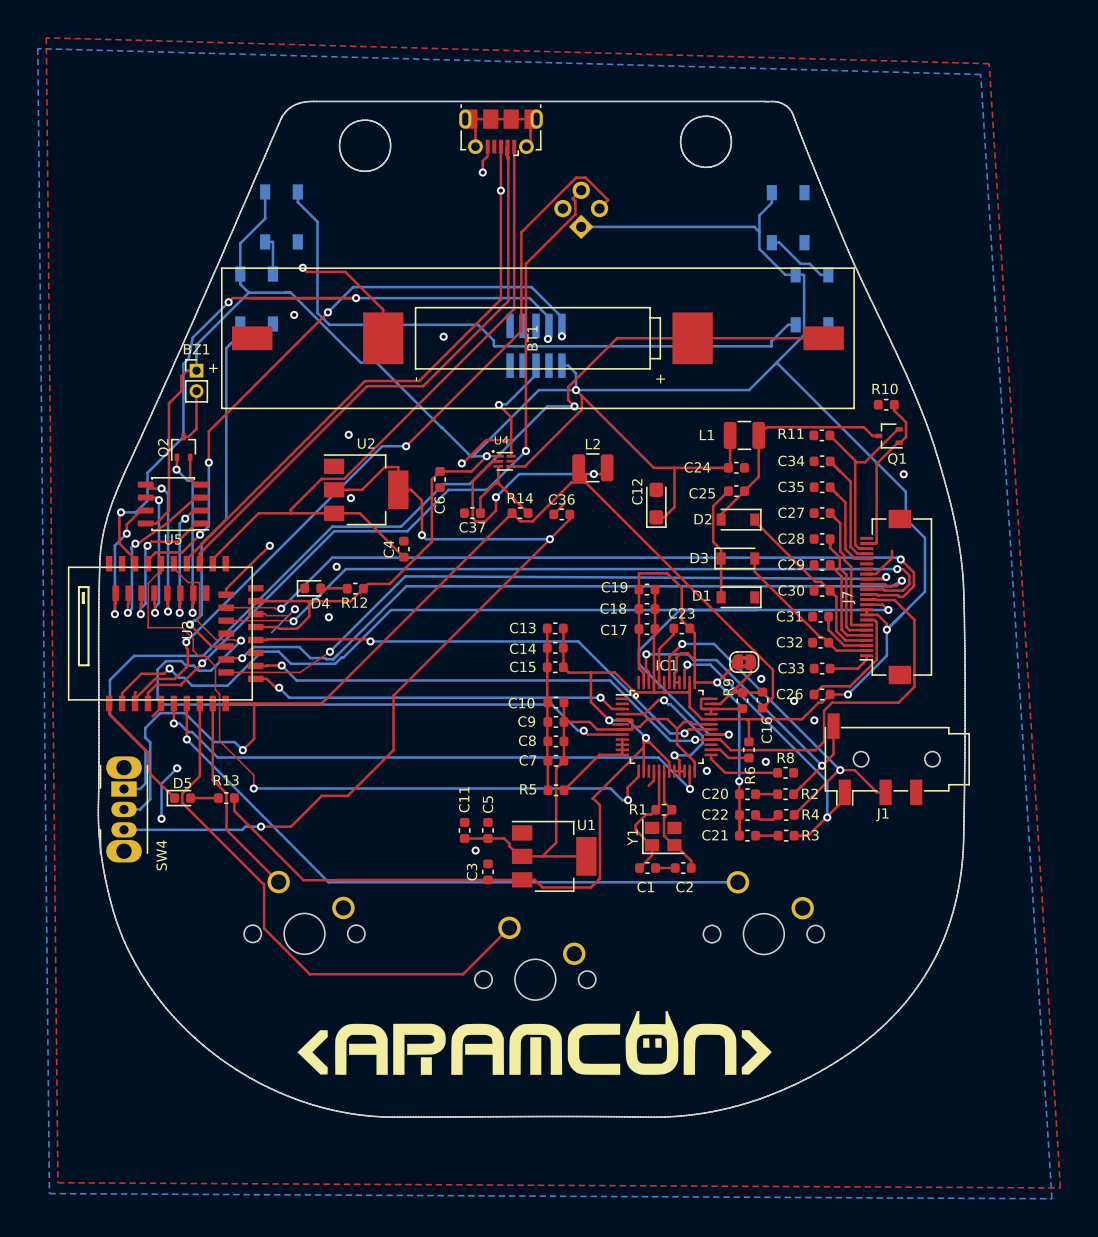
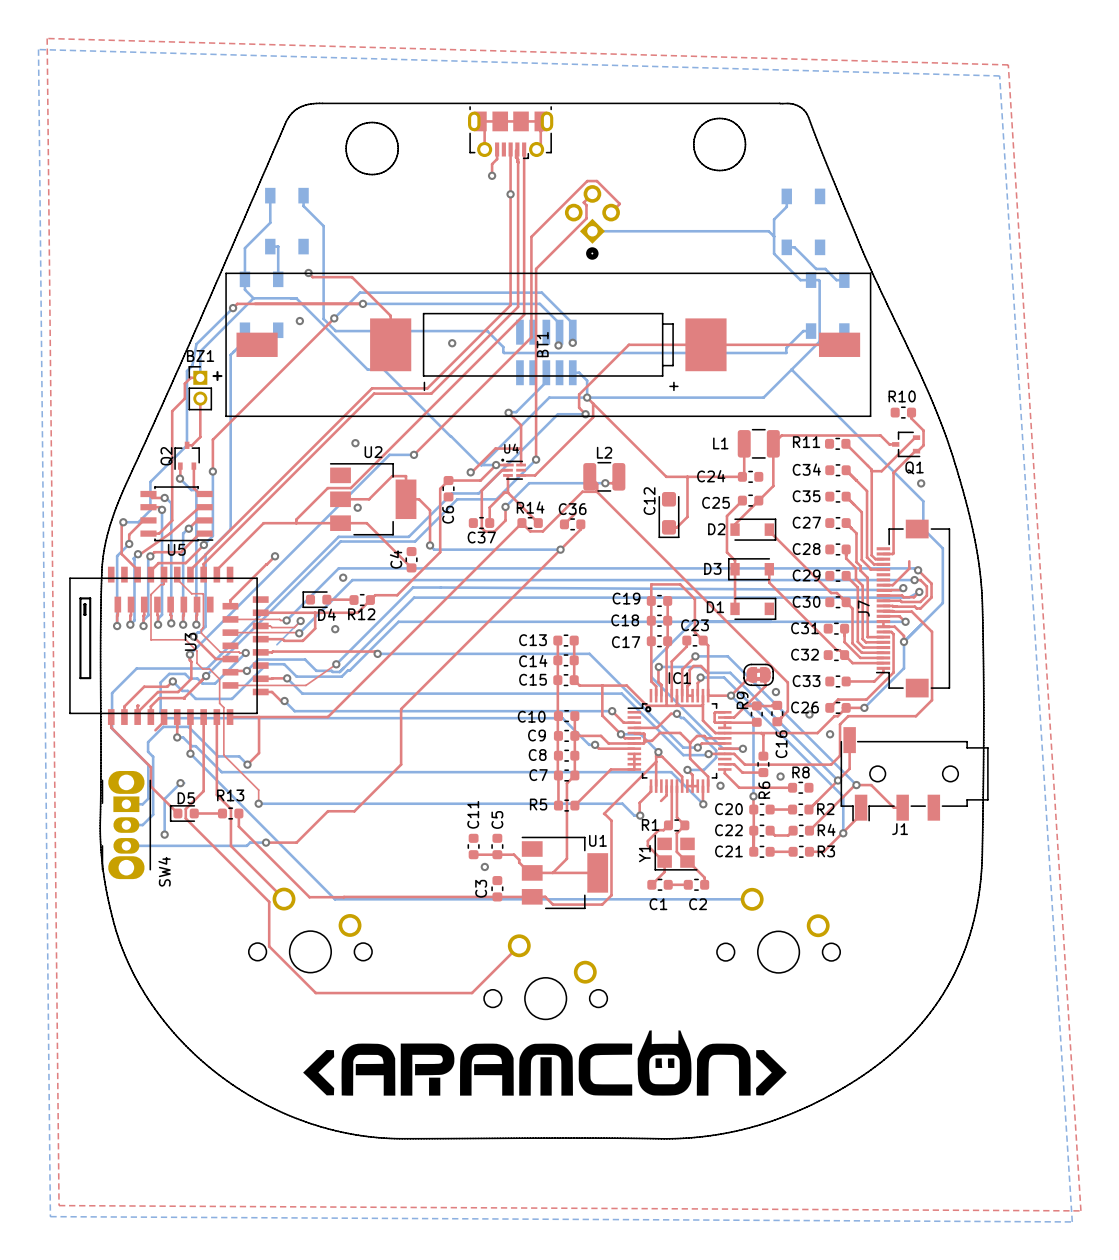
drawing: none -> [586, 247, 599, 260]

